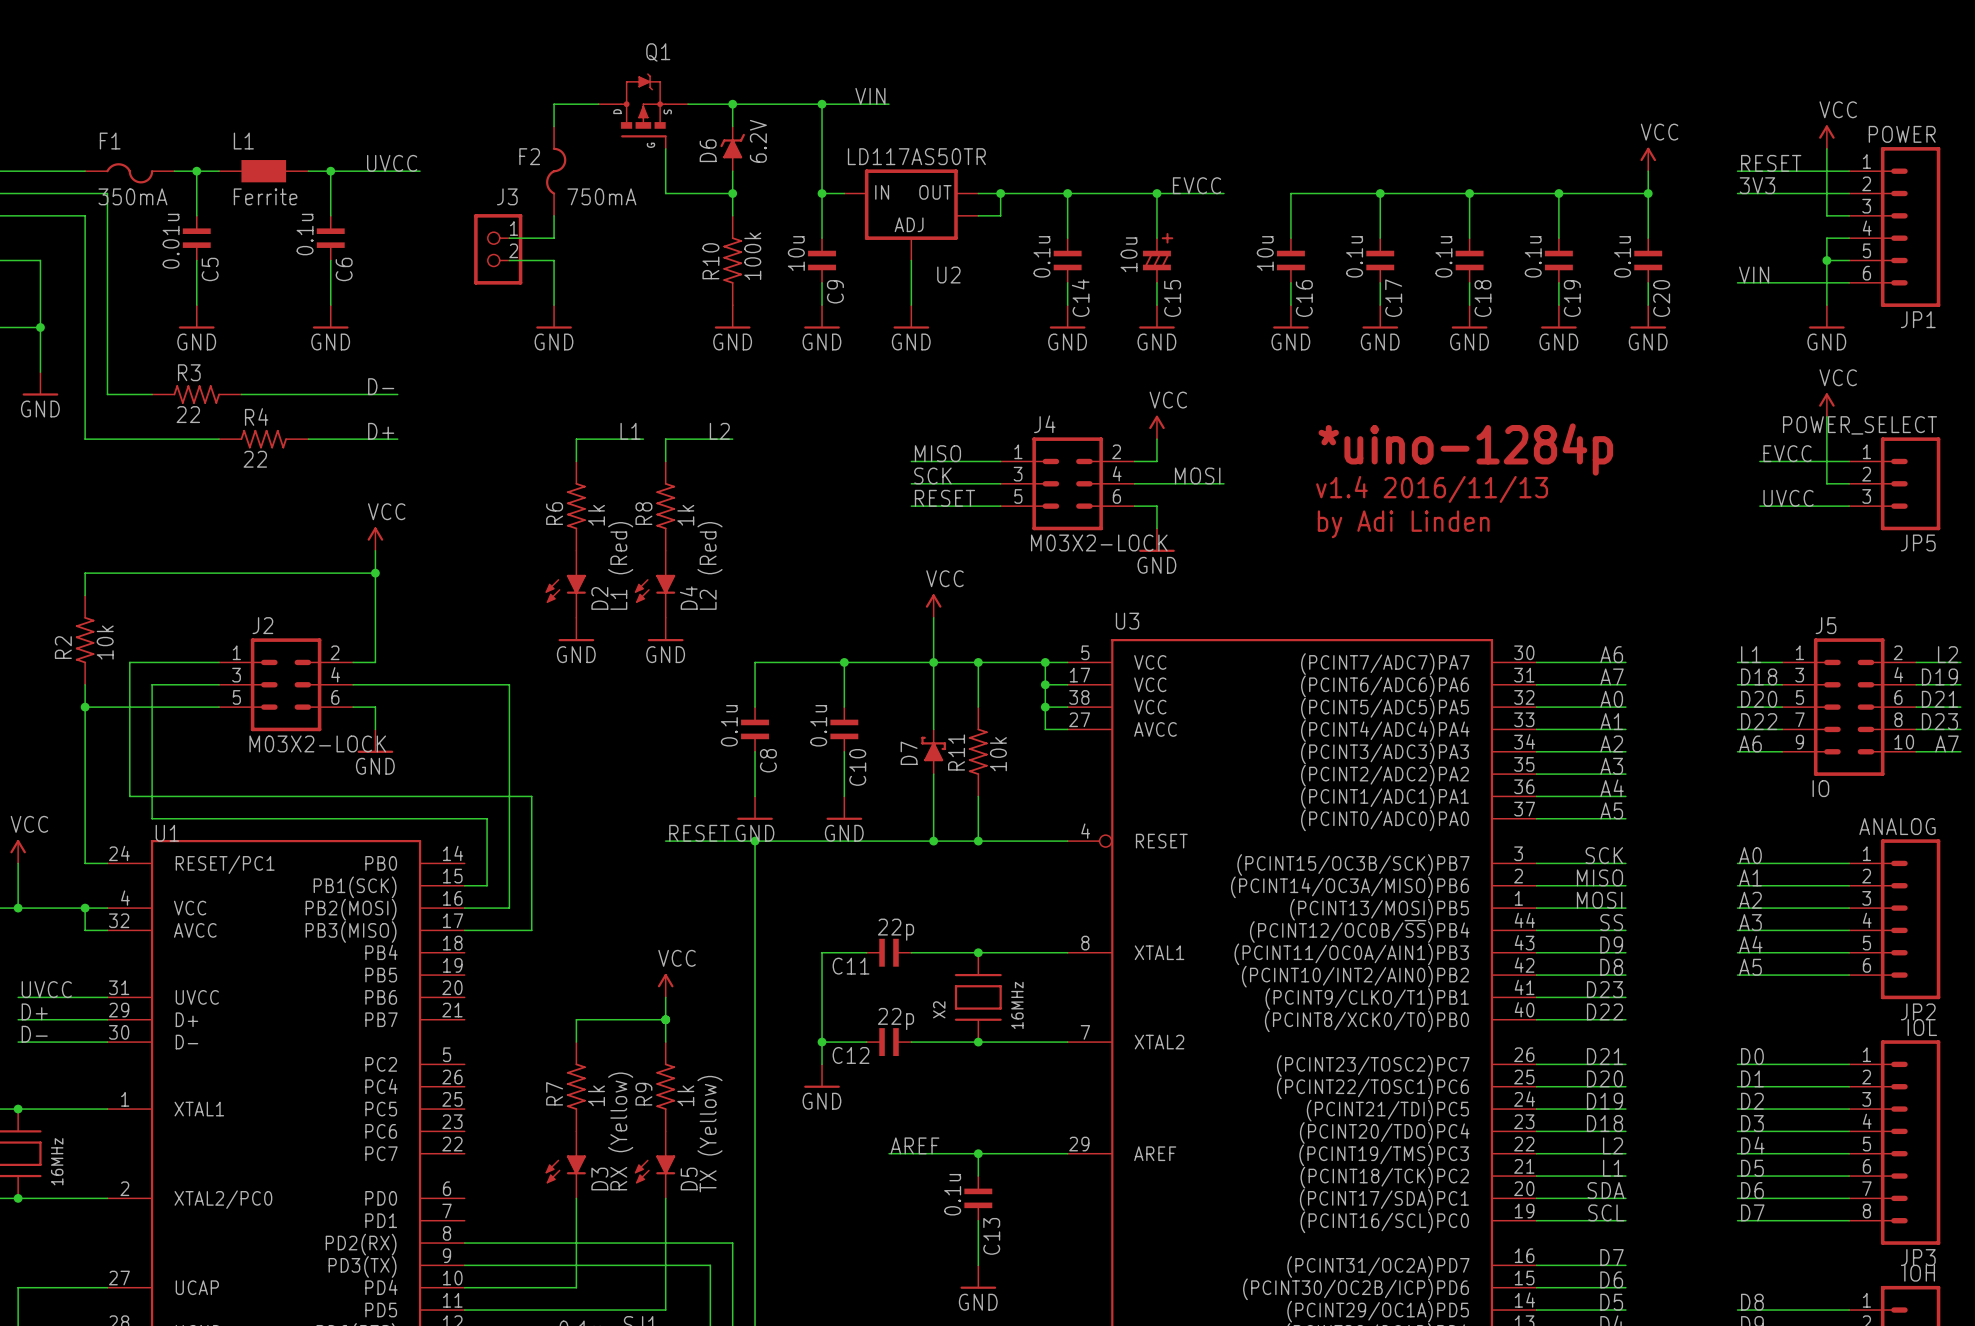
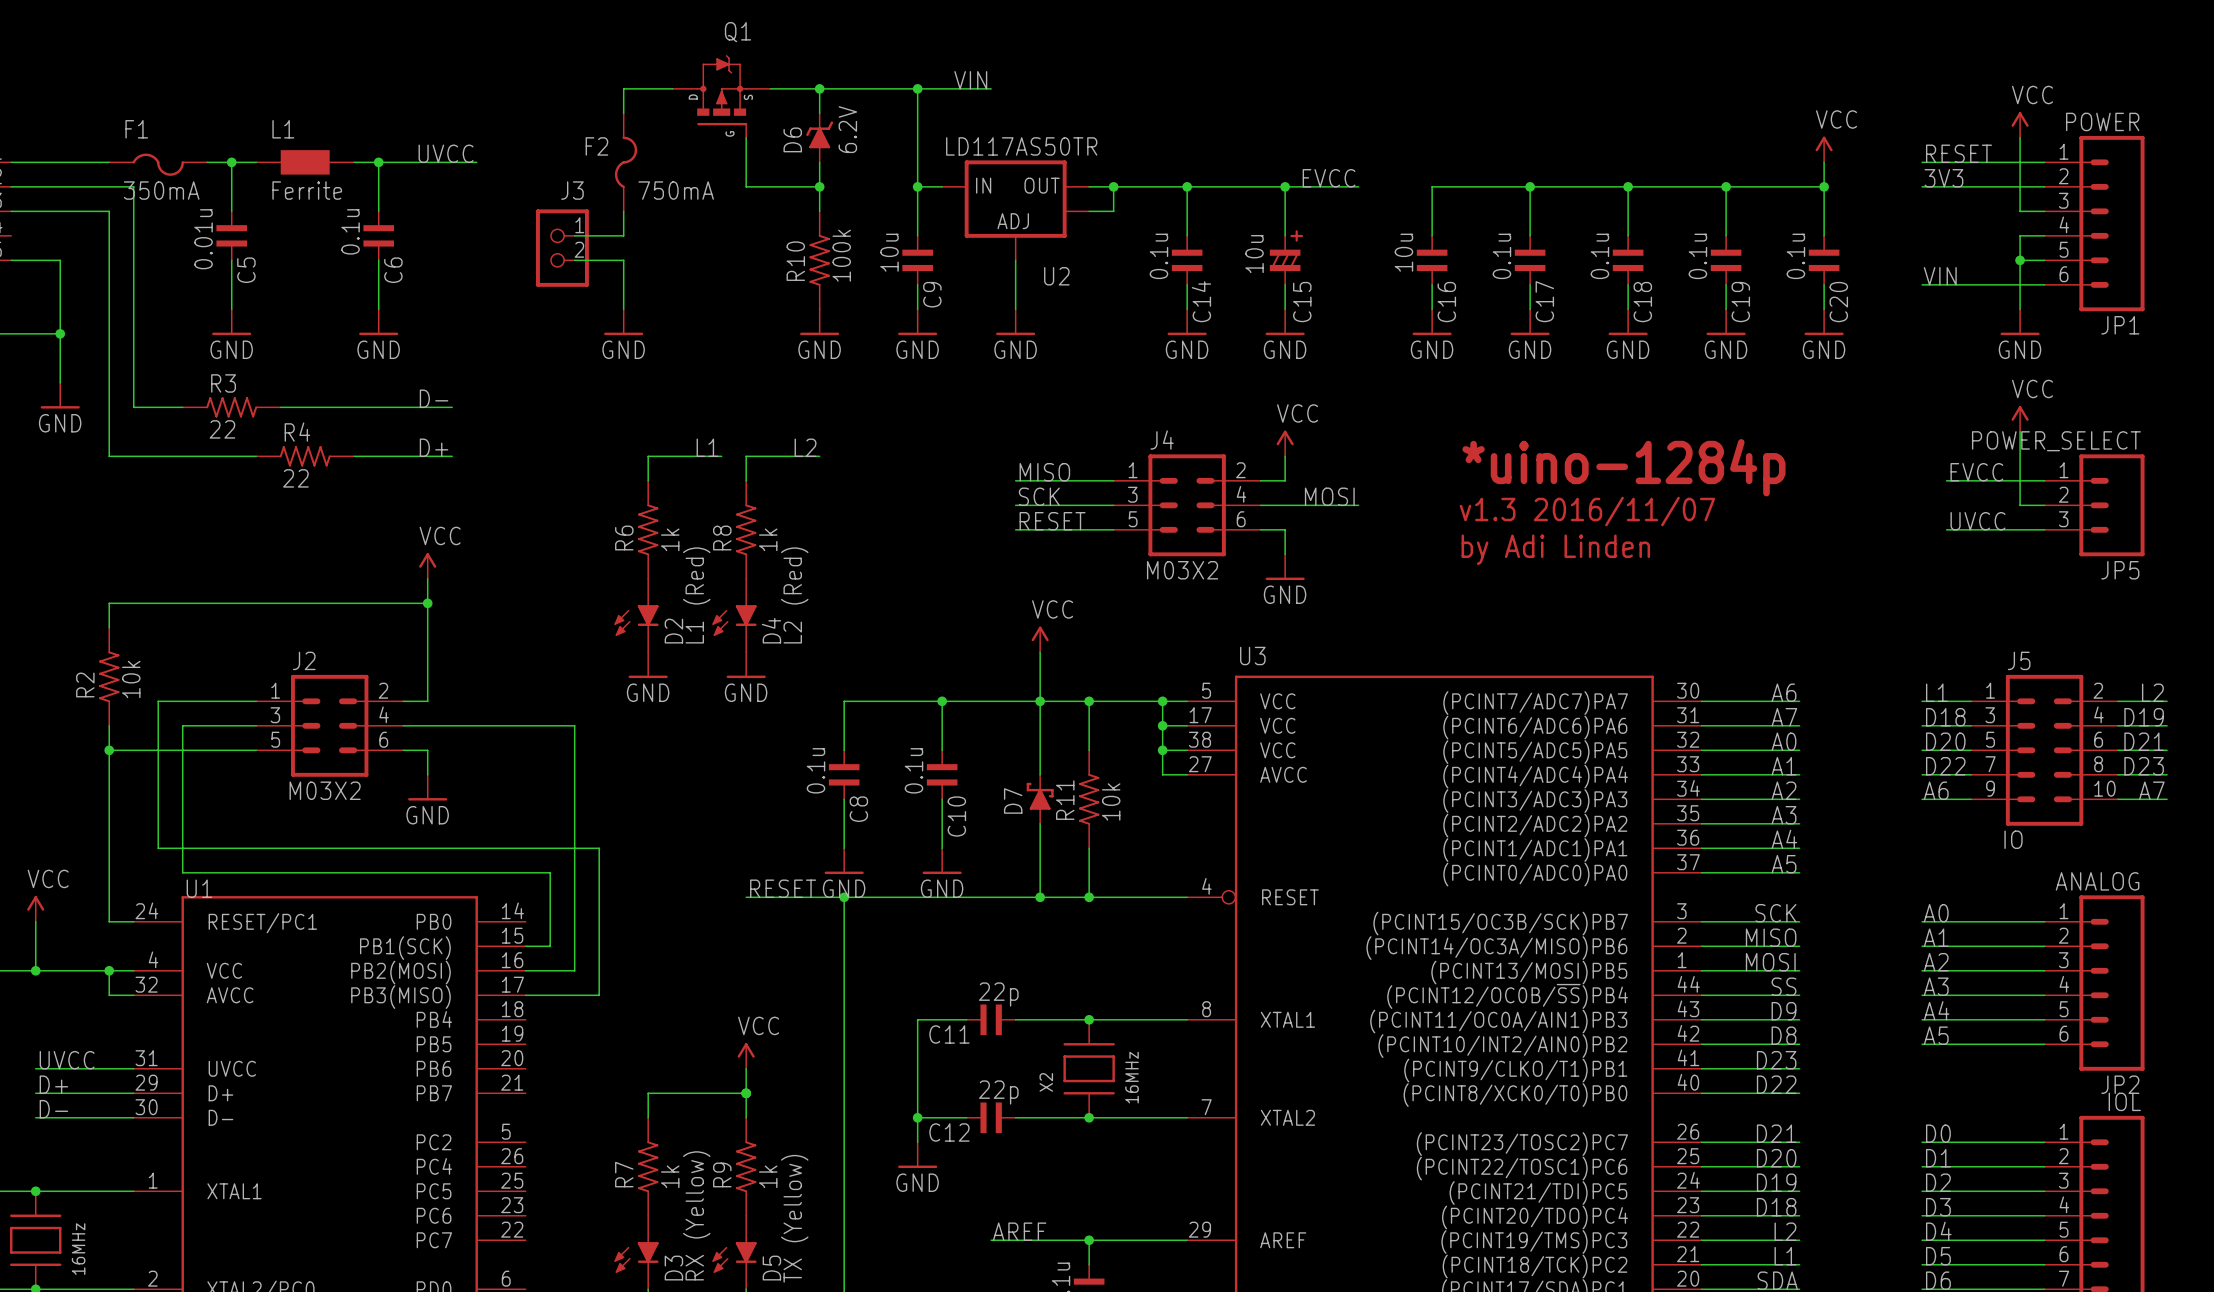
text: v1.4 2016/11/13 (1432, 489) -> v1.3 2016/11/07 (1587, 511)
J4 value: M03X2-LOCK (1099, 542) -> M03X2 (1182, 570)
J2 value: M03X2-LOCK (317, 743) -> M03X2 (325, 790)

